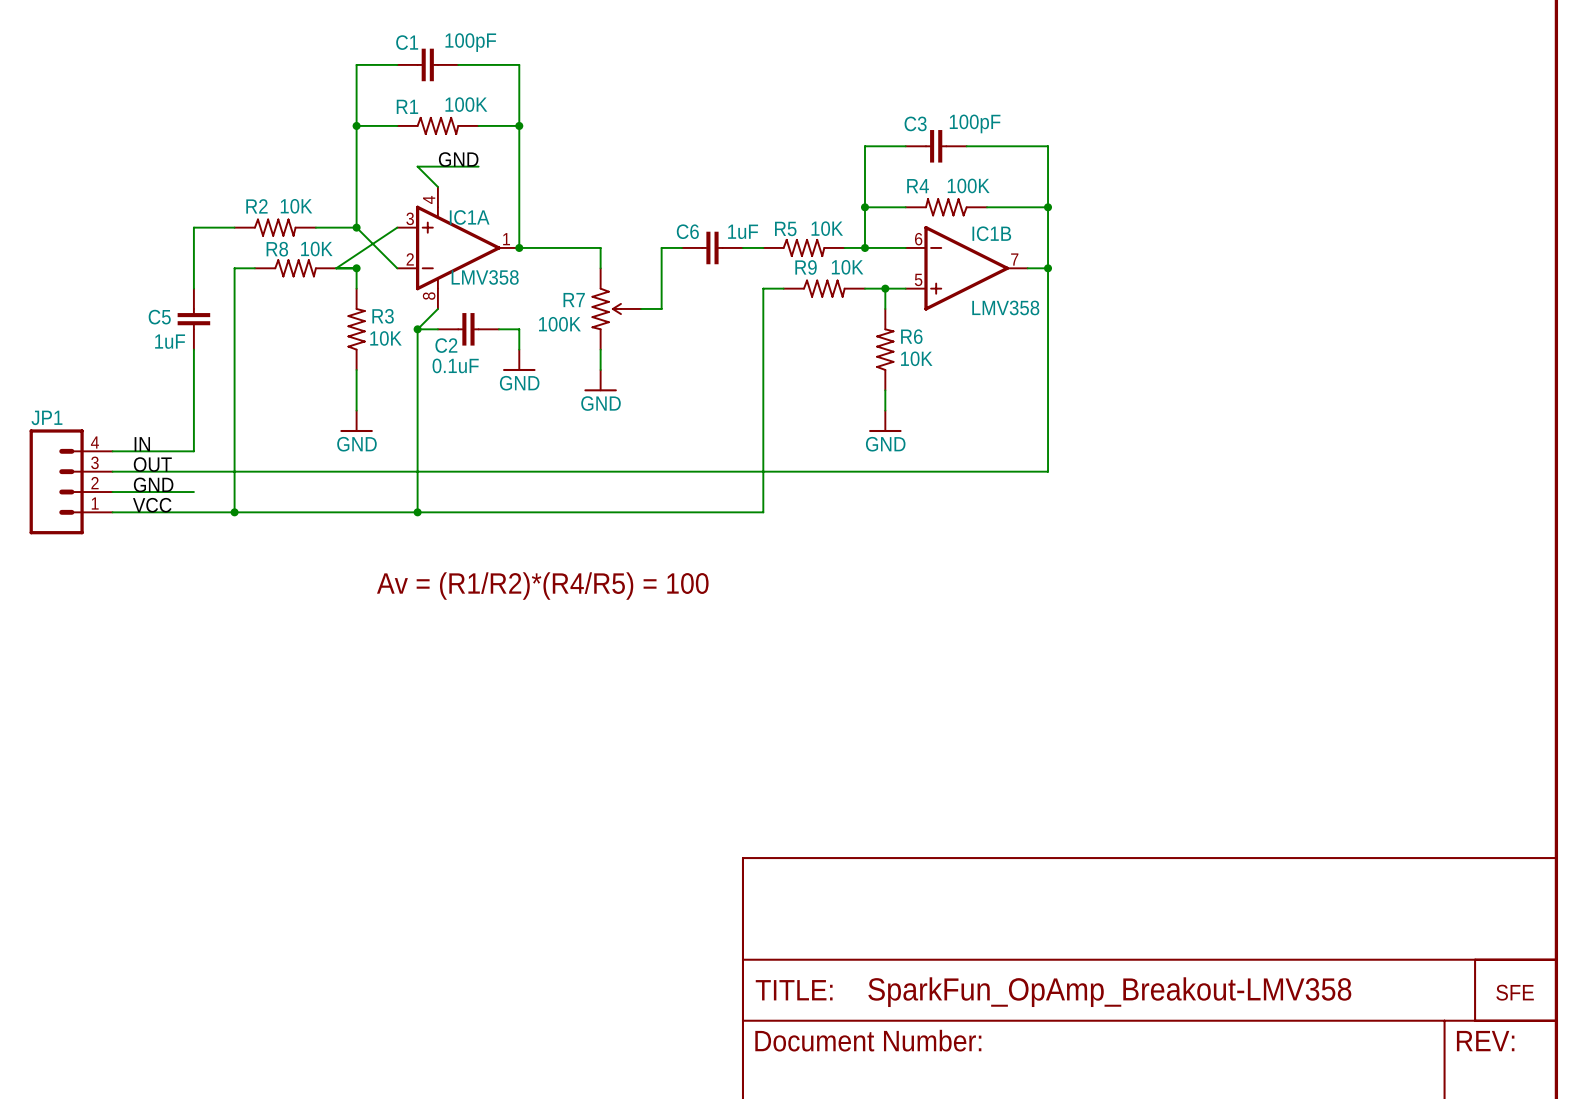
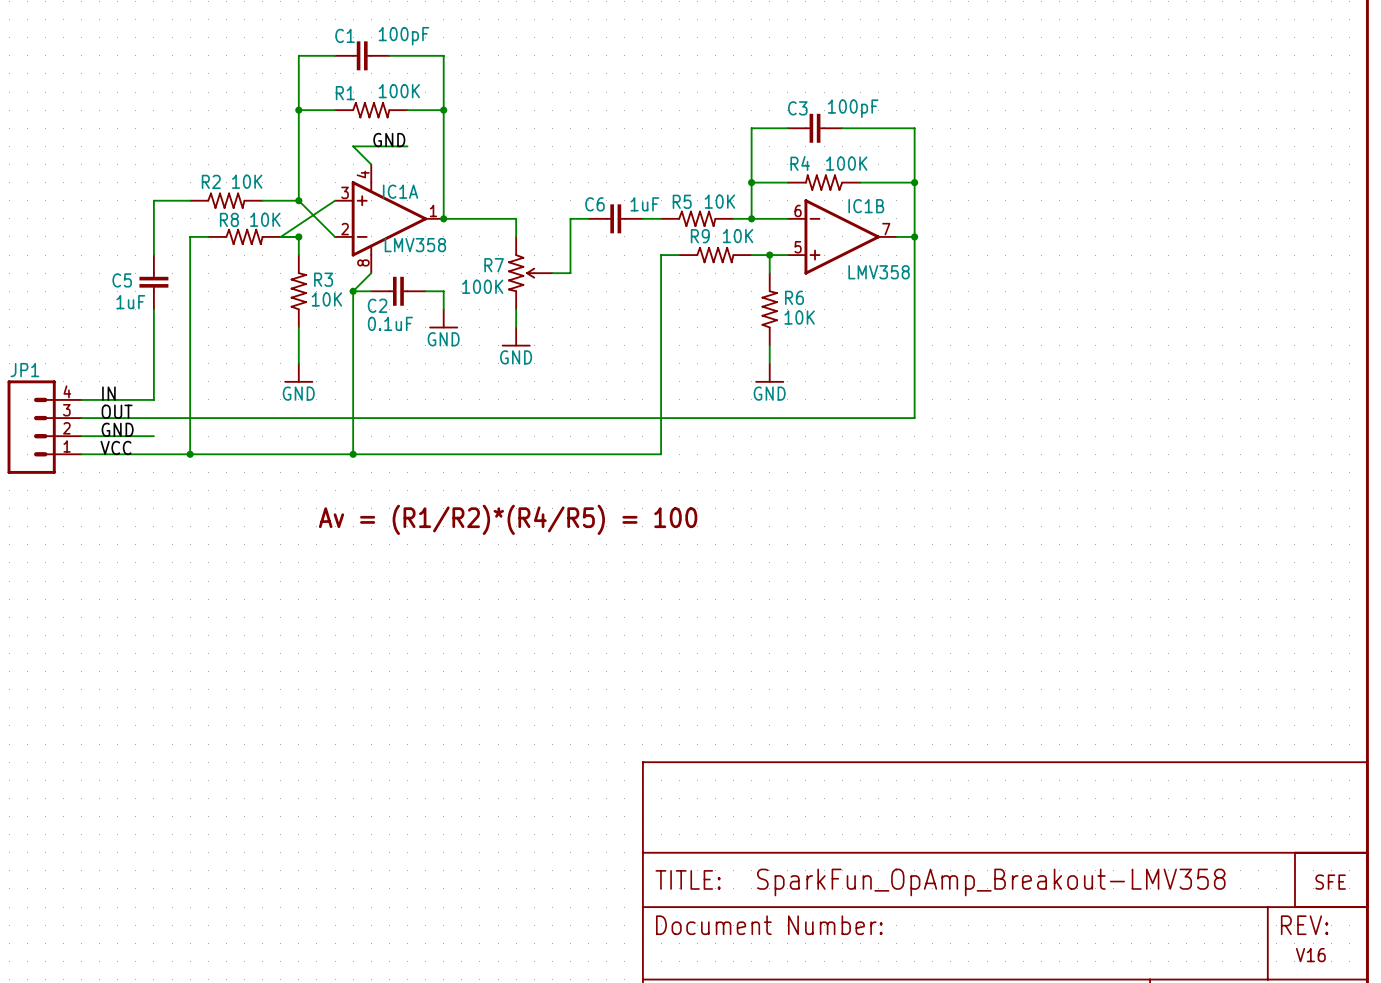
text: none -> V16 (1310, 955)

